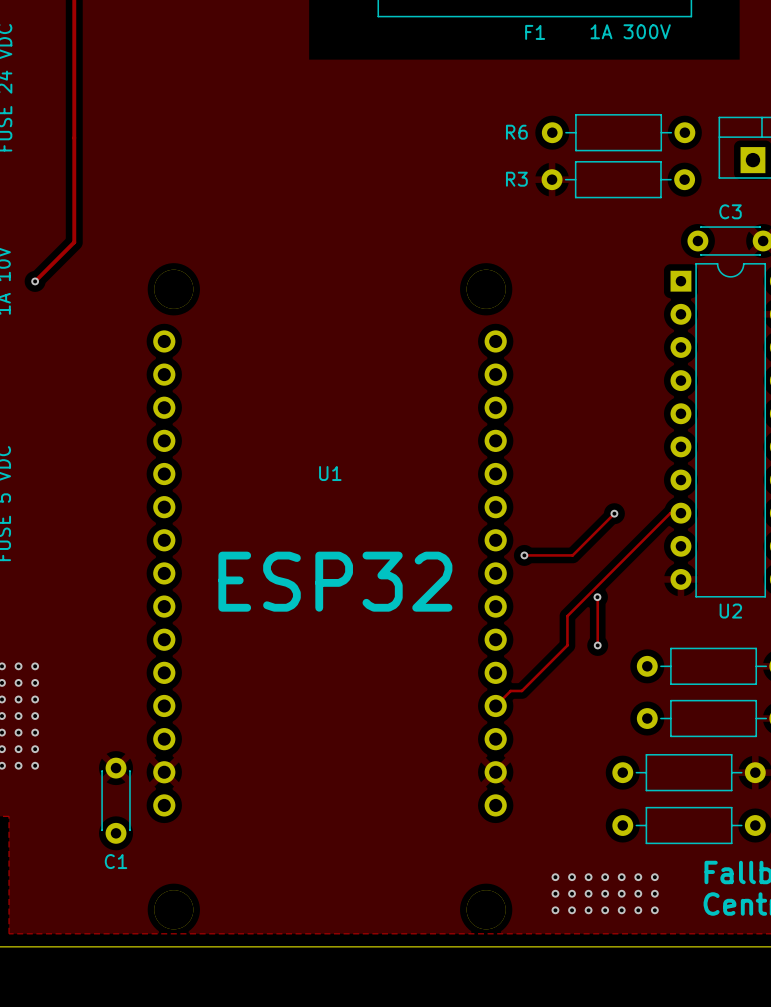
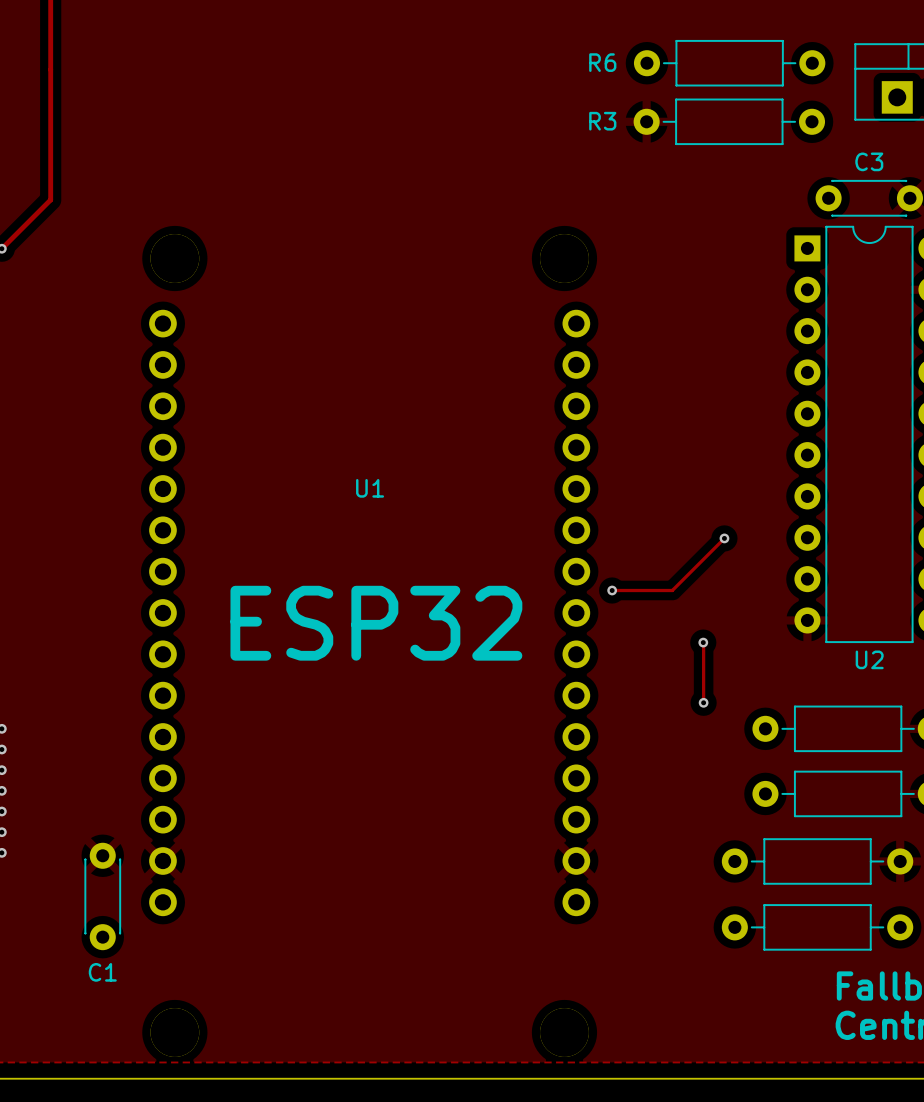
track: (680, 513) (670, 513) (567, 616) (567, 645) (521, 690) (510, 690) (495, 705) -> none
via: (555, 877) -> none
via: (572, 877) -> none
via: (588, 877) -> none
via: (605, 877) -> none
via: (621, 877) -> none
via: (638, 877) -> none
via: (654, 877) -> none
via: (555, 893) -> none
via: (572, 893) -> none
via: (588, 893) -> none
via: (605, 893) -> none
via: (621, 893) -> none
via: (638, 893) -> none
via: (654, 893) -> none
via: (555, 910) -> none
via: (572, 910) -> none
via: (588, 910) -> none
via: (605, 910) -> none
via: (621, 910) -> none
via: (638, 910) -> none
via: (654, 910) -> none

